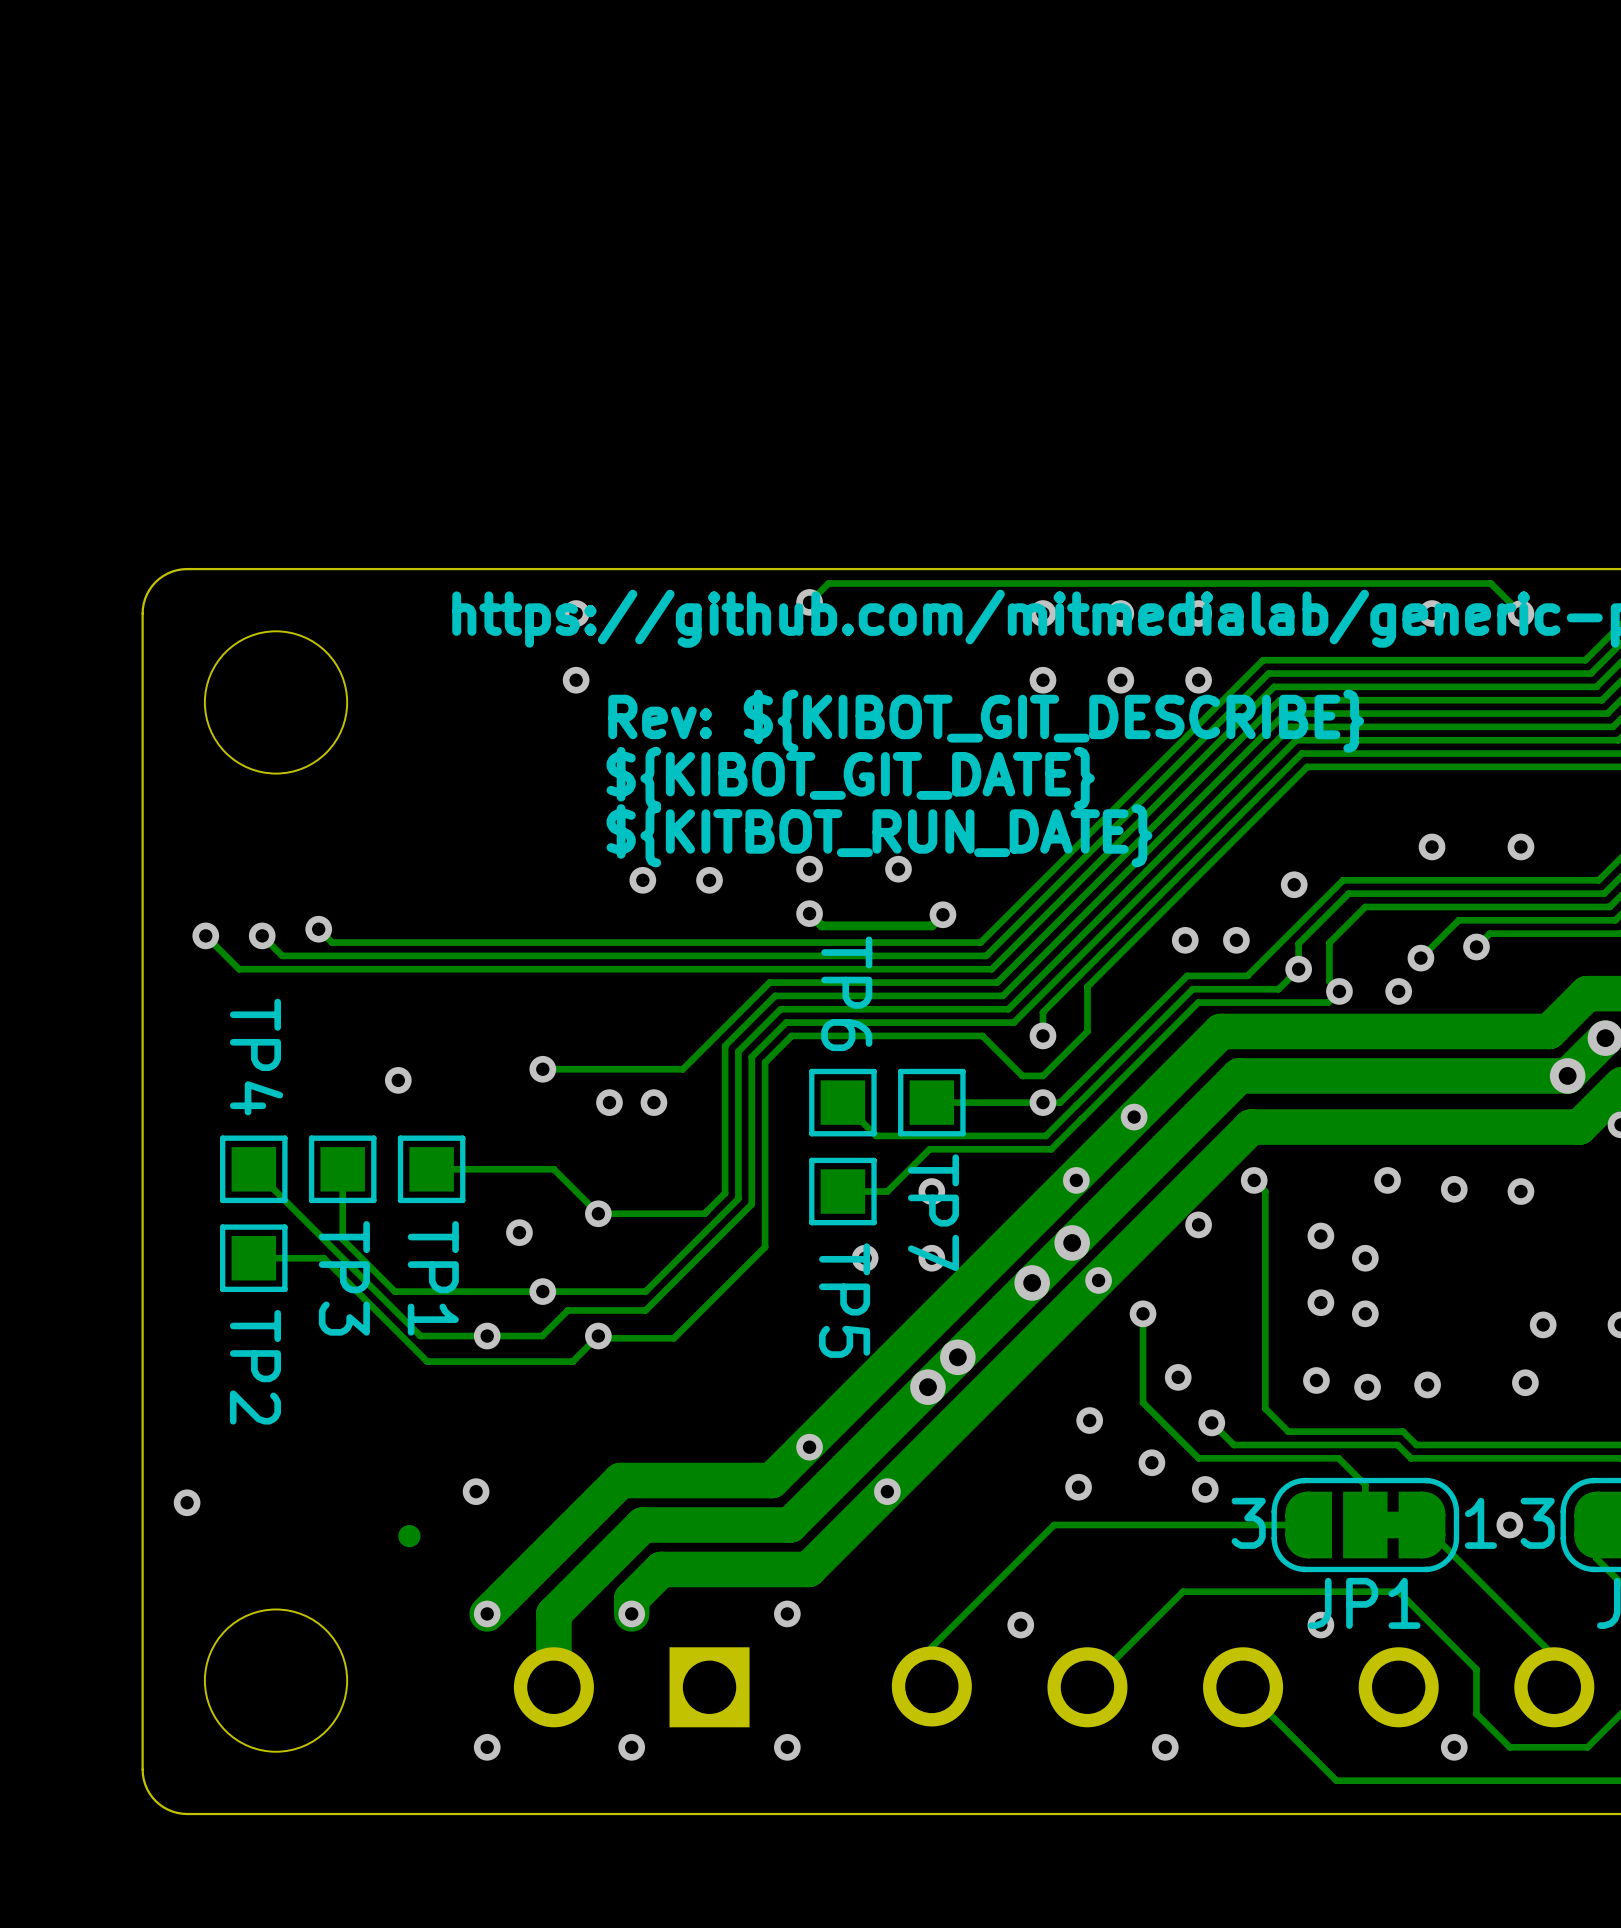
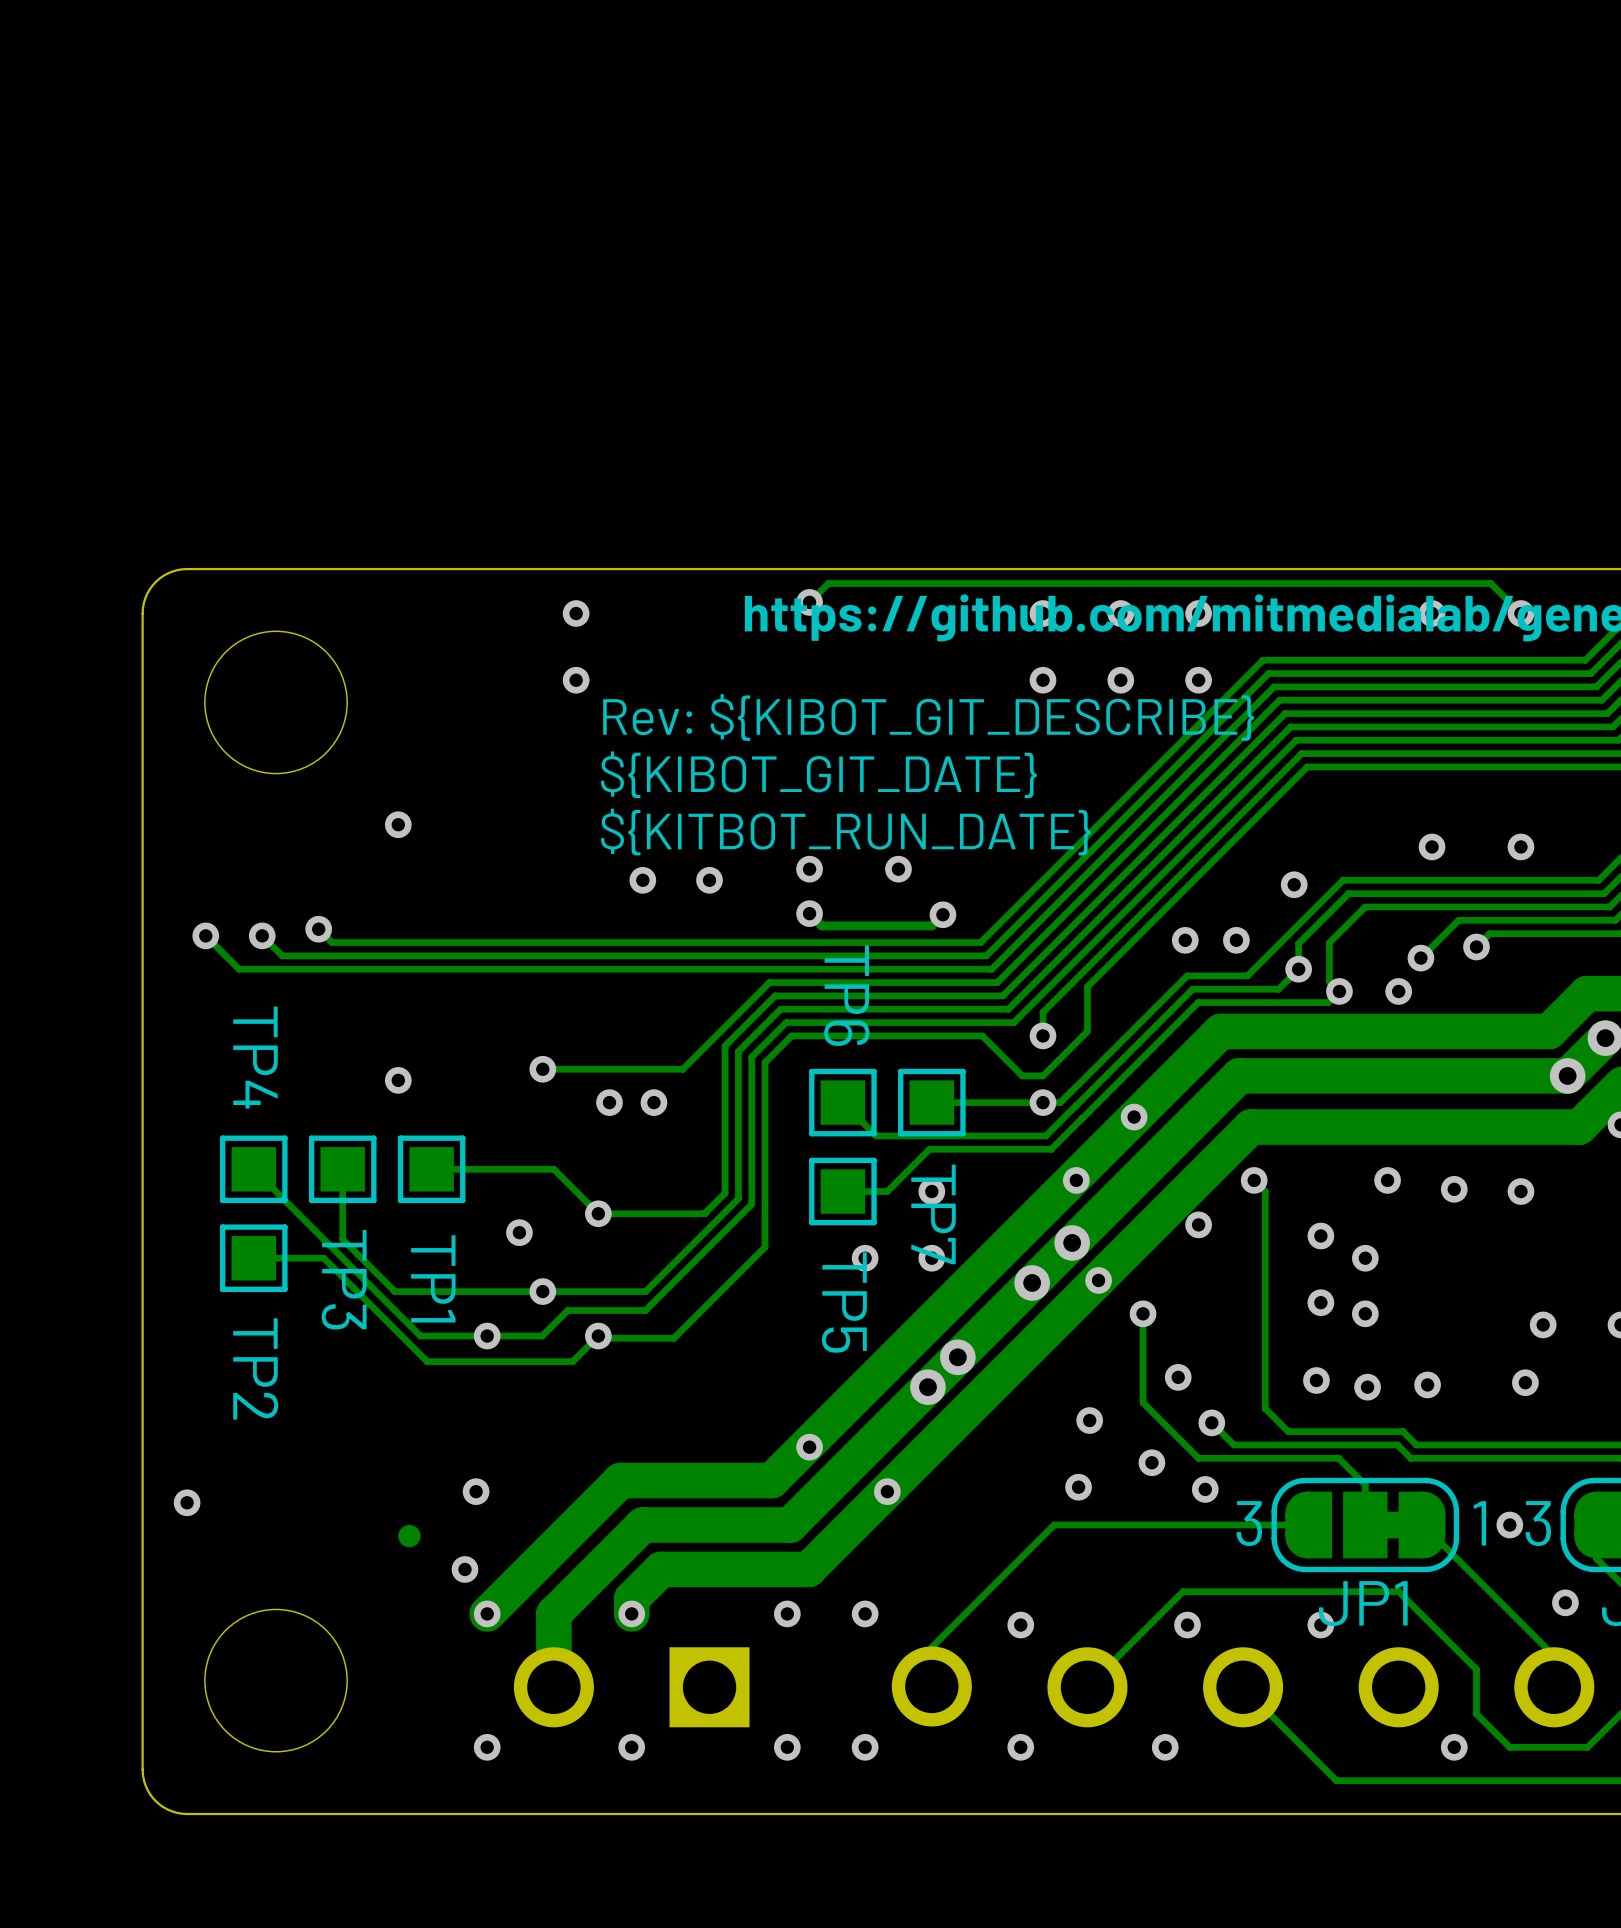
via: none -> (398, 824)
via: none -> (464, 1569)
via: none -> (1565, 1602)
via: none -> (865, 1613)
via: none -> (1187, 1625)
via: none -> (865, 1747)
via: none -> (1020, 1747)

